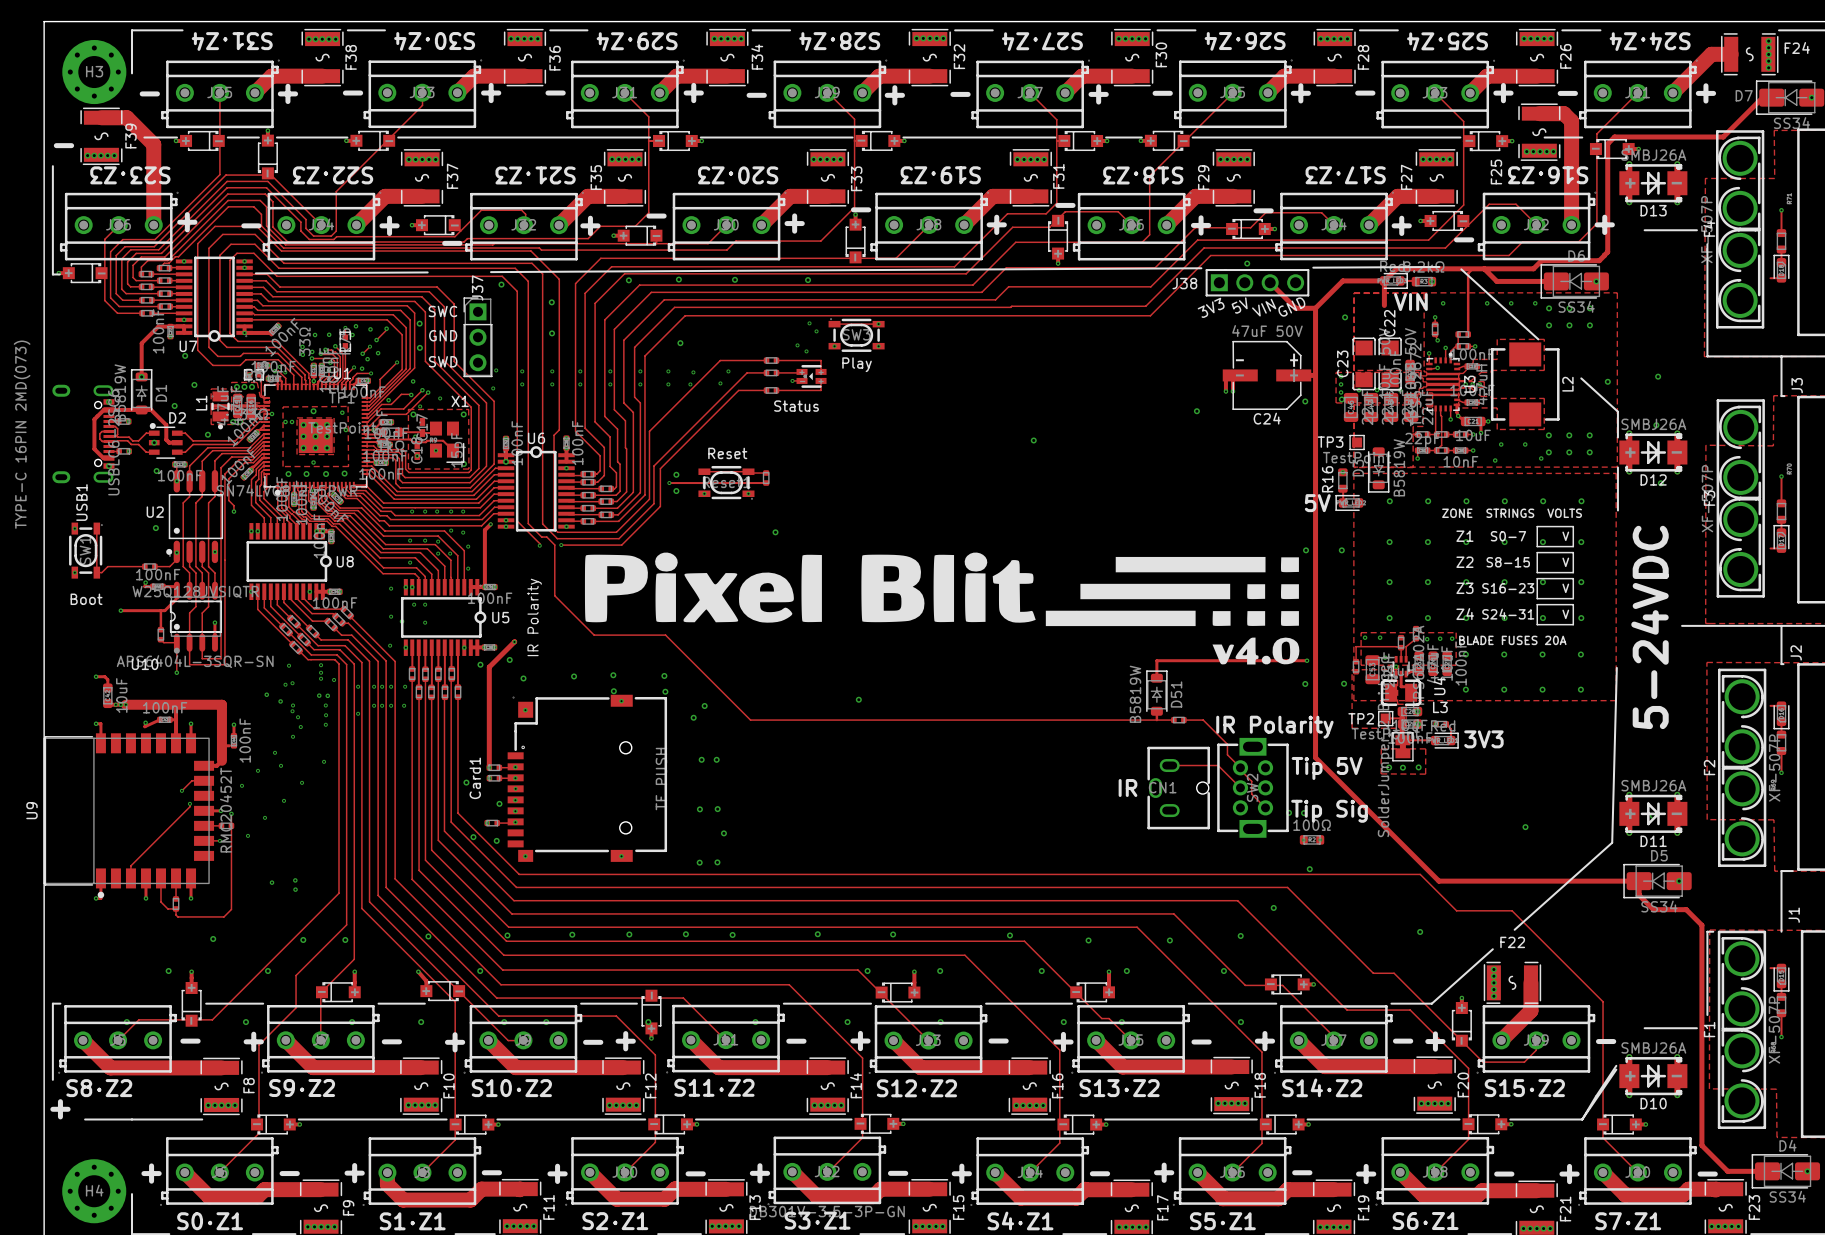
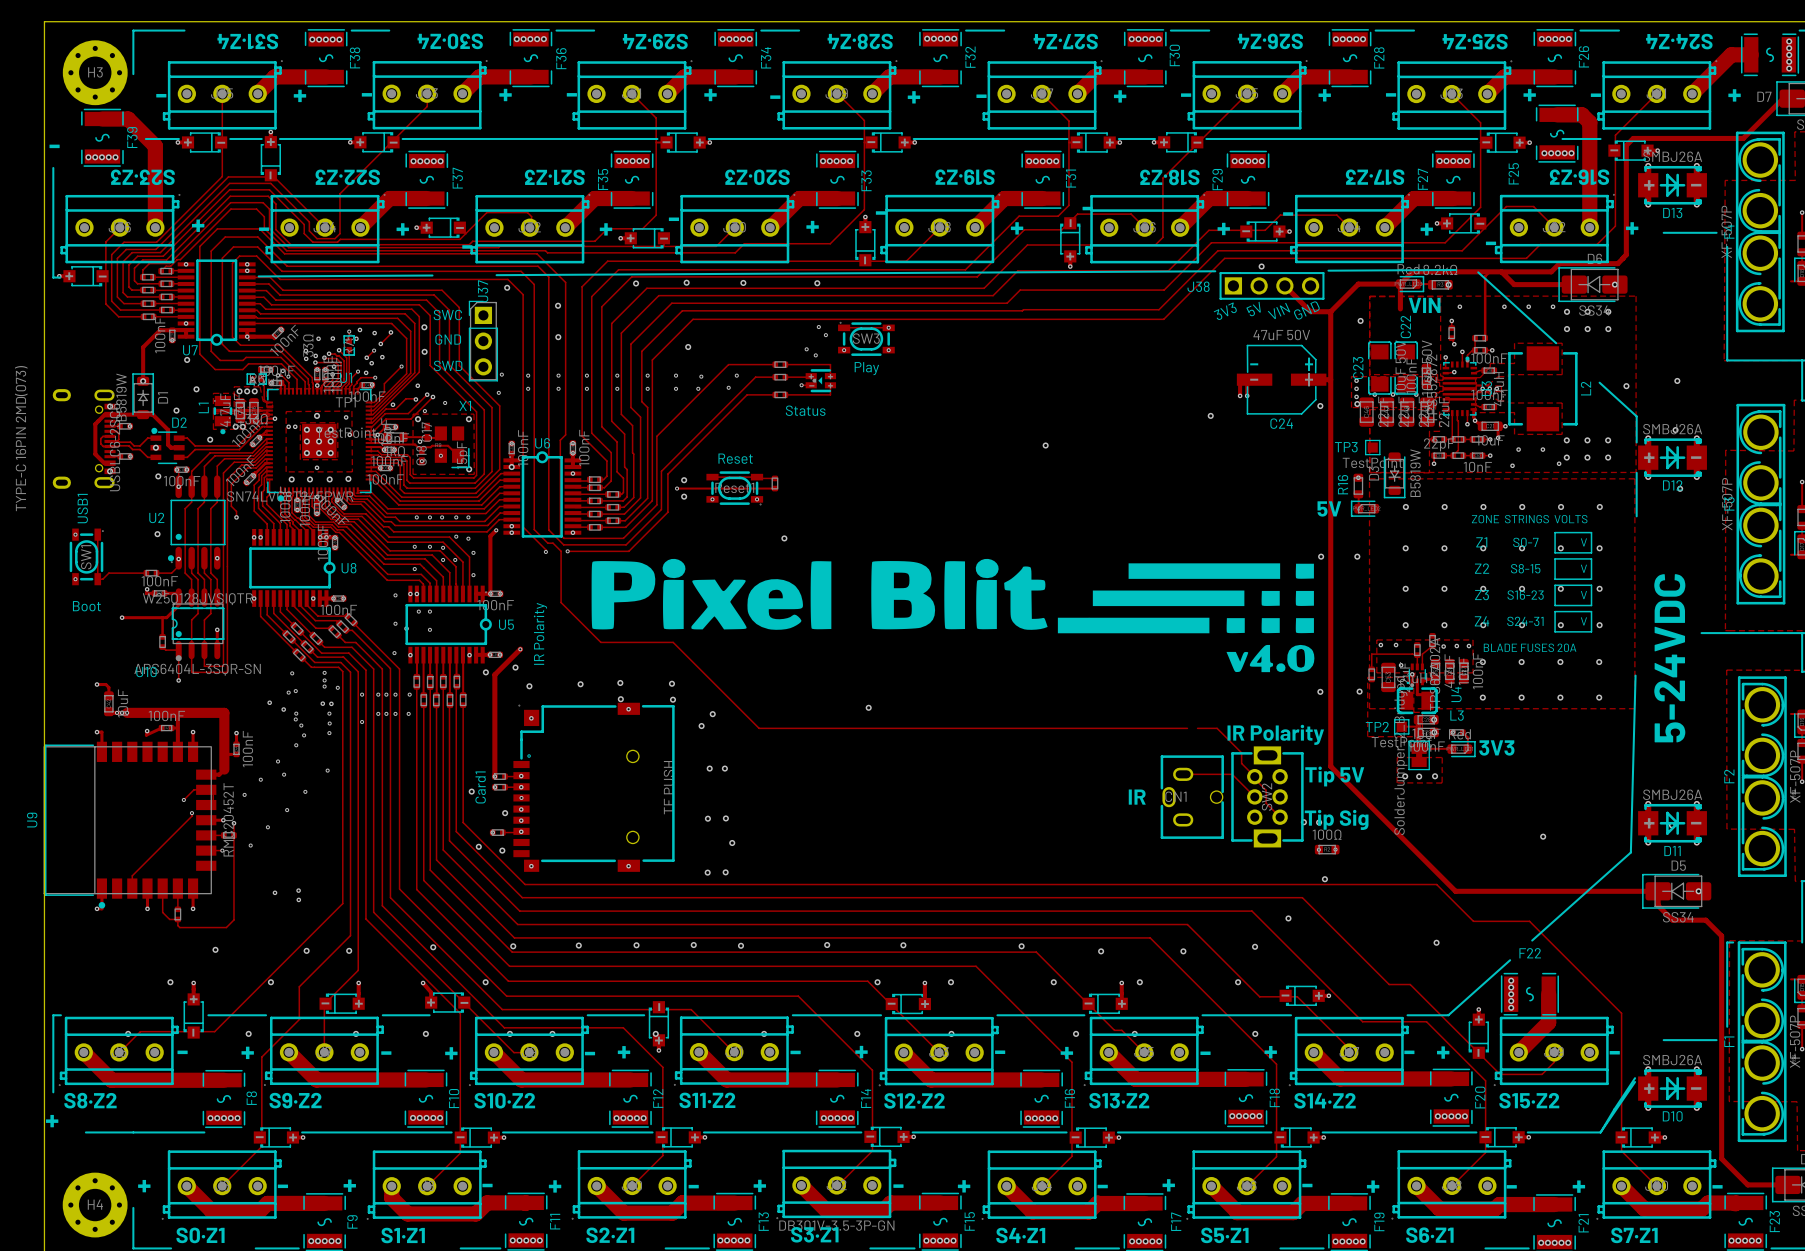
track: (1307, 660) (1156, 660) (1156, 678) -> none
via: (1307, 660) -> none
D51: B5819W (1156, 693) -> none
track: (1156, 711) (1156, 720) -> none
part: (1178, 720) -> none

